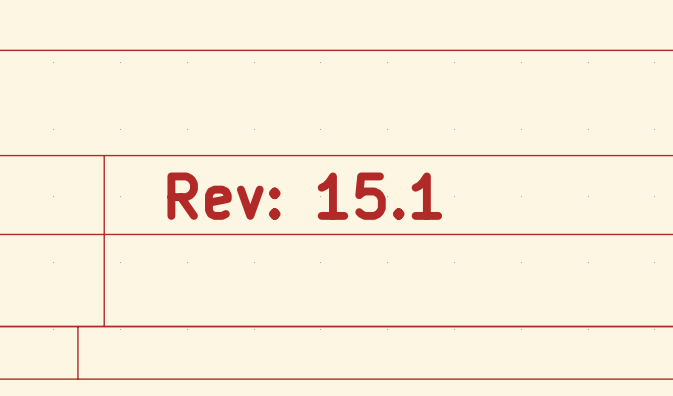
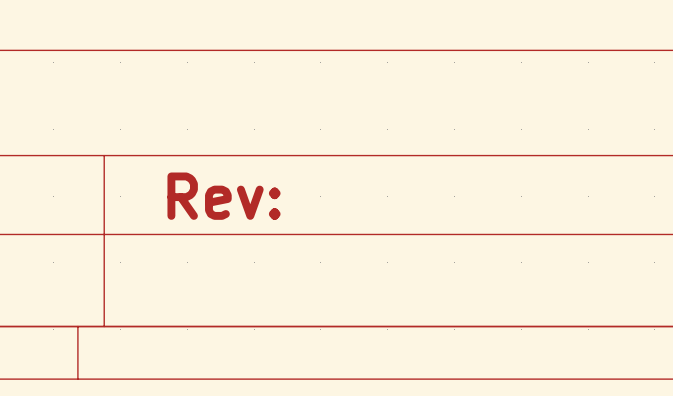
title block: Rev: 15.1 (304, 196) -> Rev: (224, 196)

